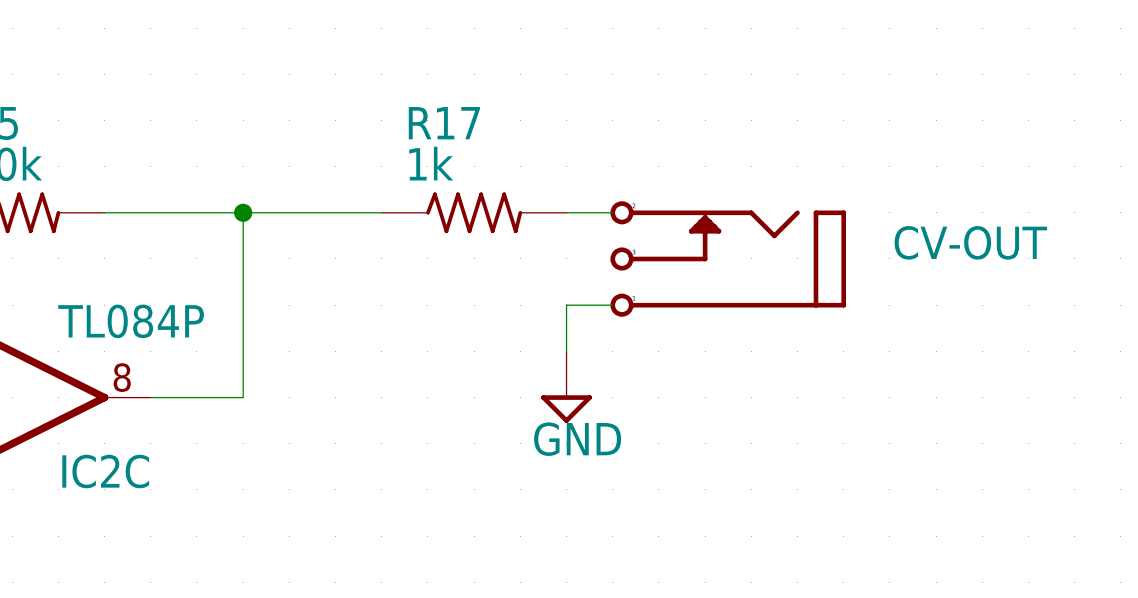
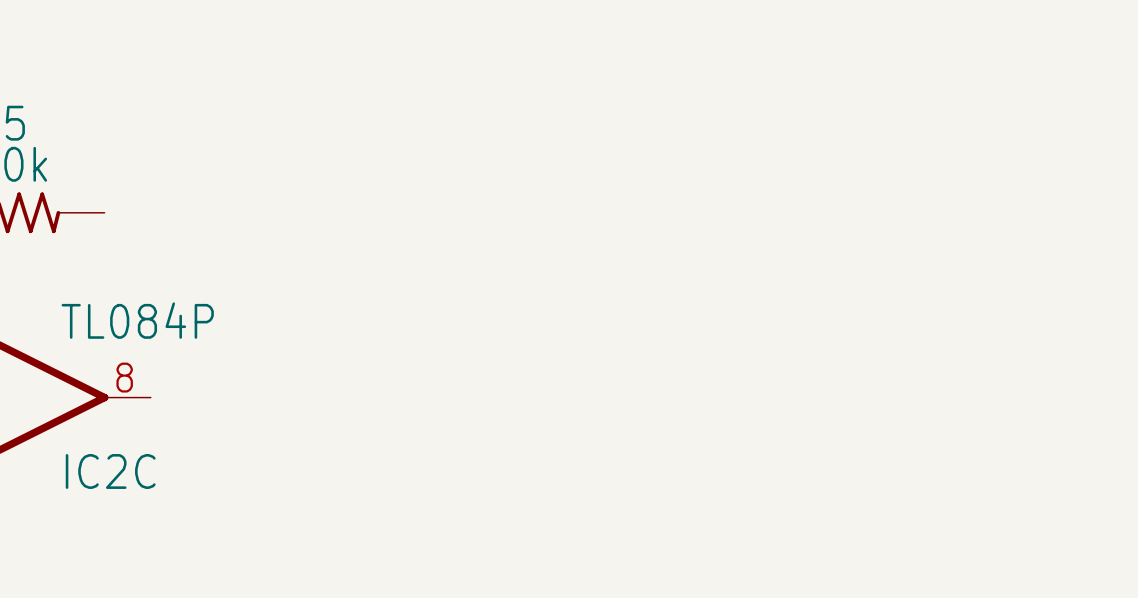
wire: (104, 212) (381, 212) -> none
wire: (243, 212) (243, 397) (150, 397) -> none
junction: (243, 212) -> none
R17: 1k (474, 212) -> none
wire: (566, 212) (612, 212) -> none
CV-OUT: (728, 258) -> none
wire: (612, 305) (566, 305) (566, 351) -> none
power symbol: GND (566, 387) -> none

